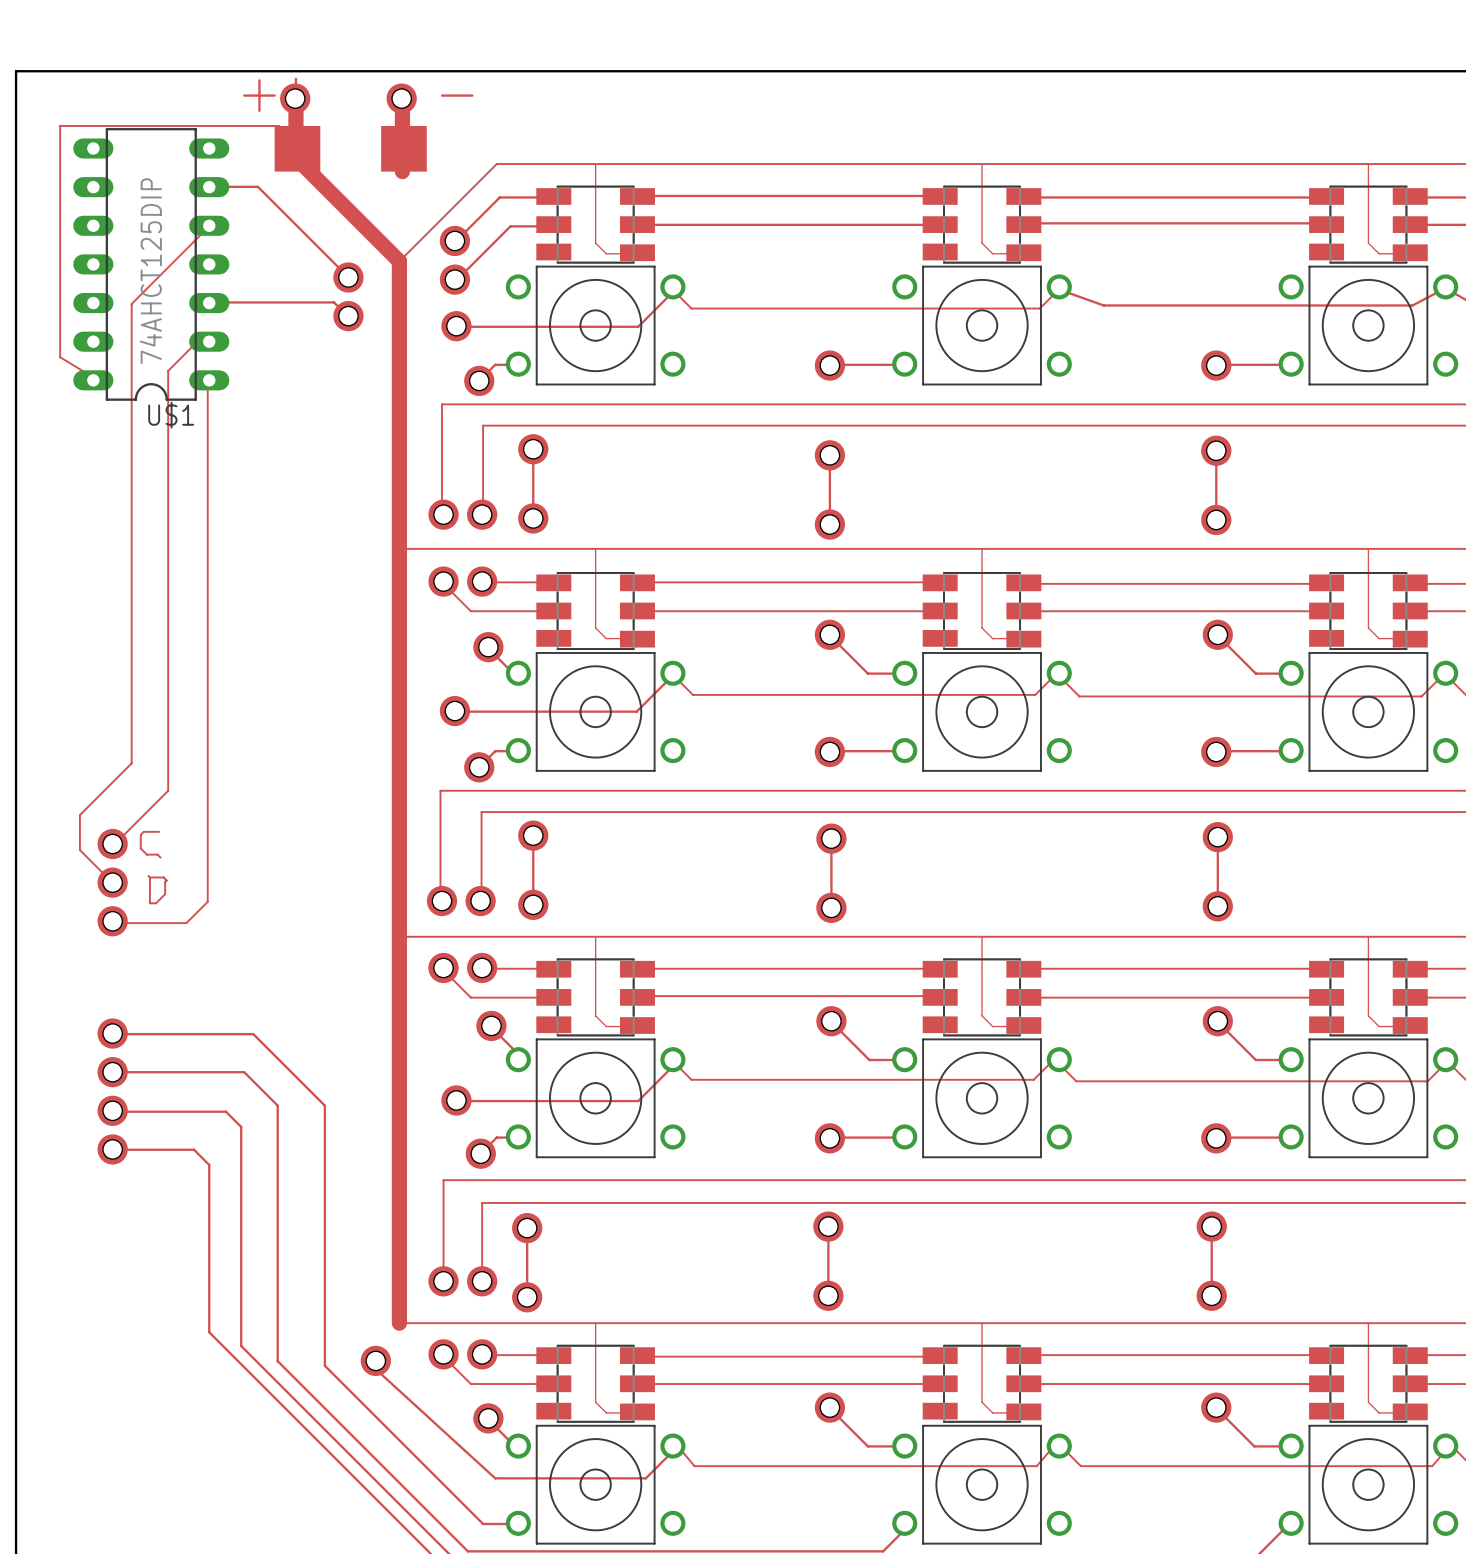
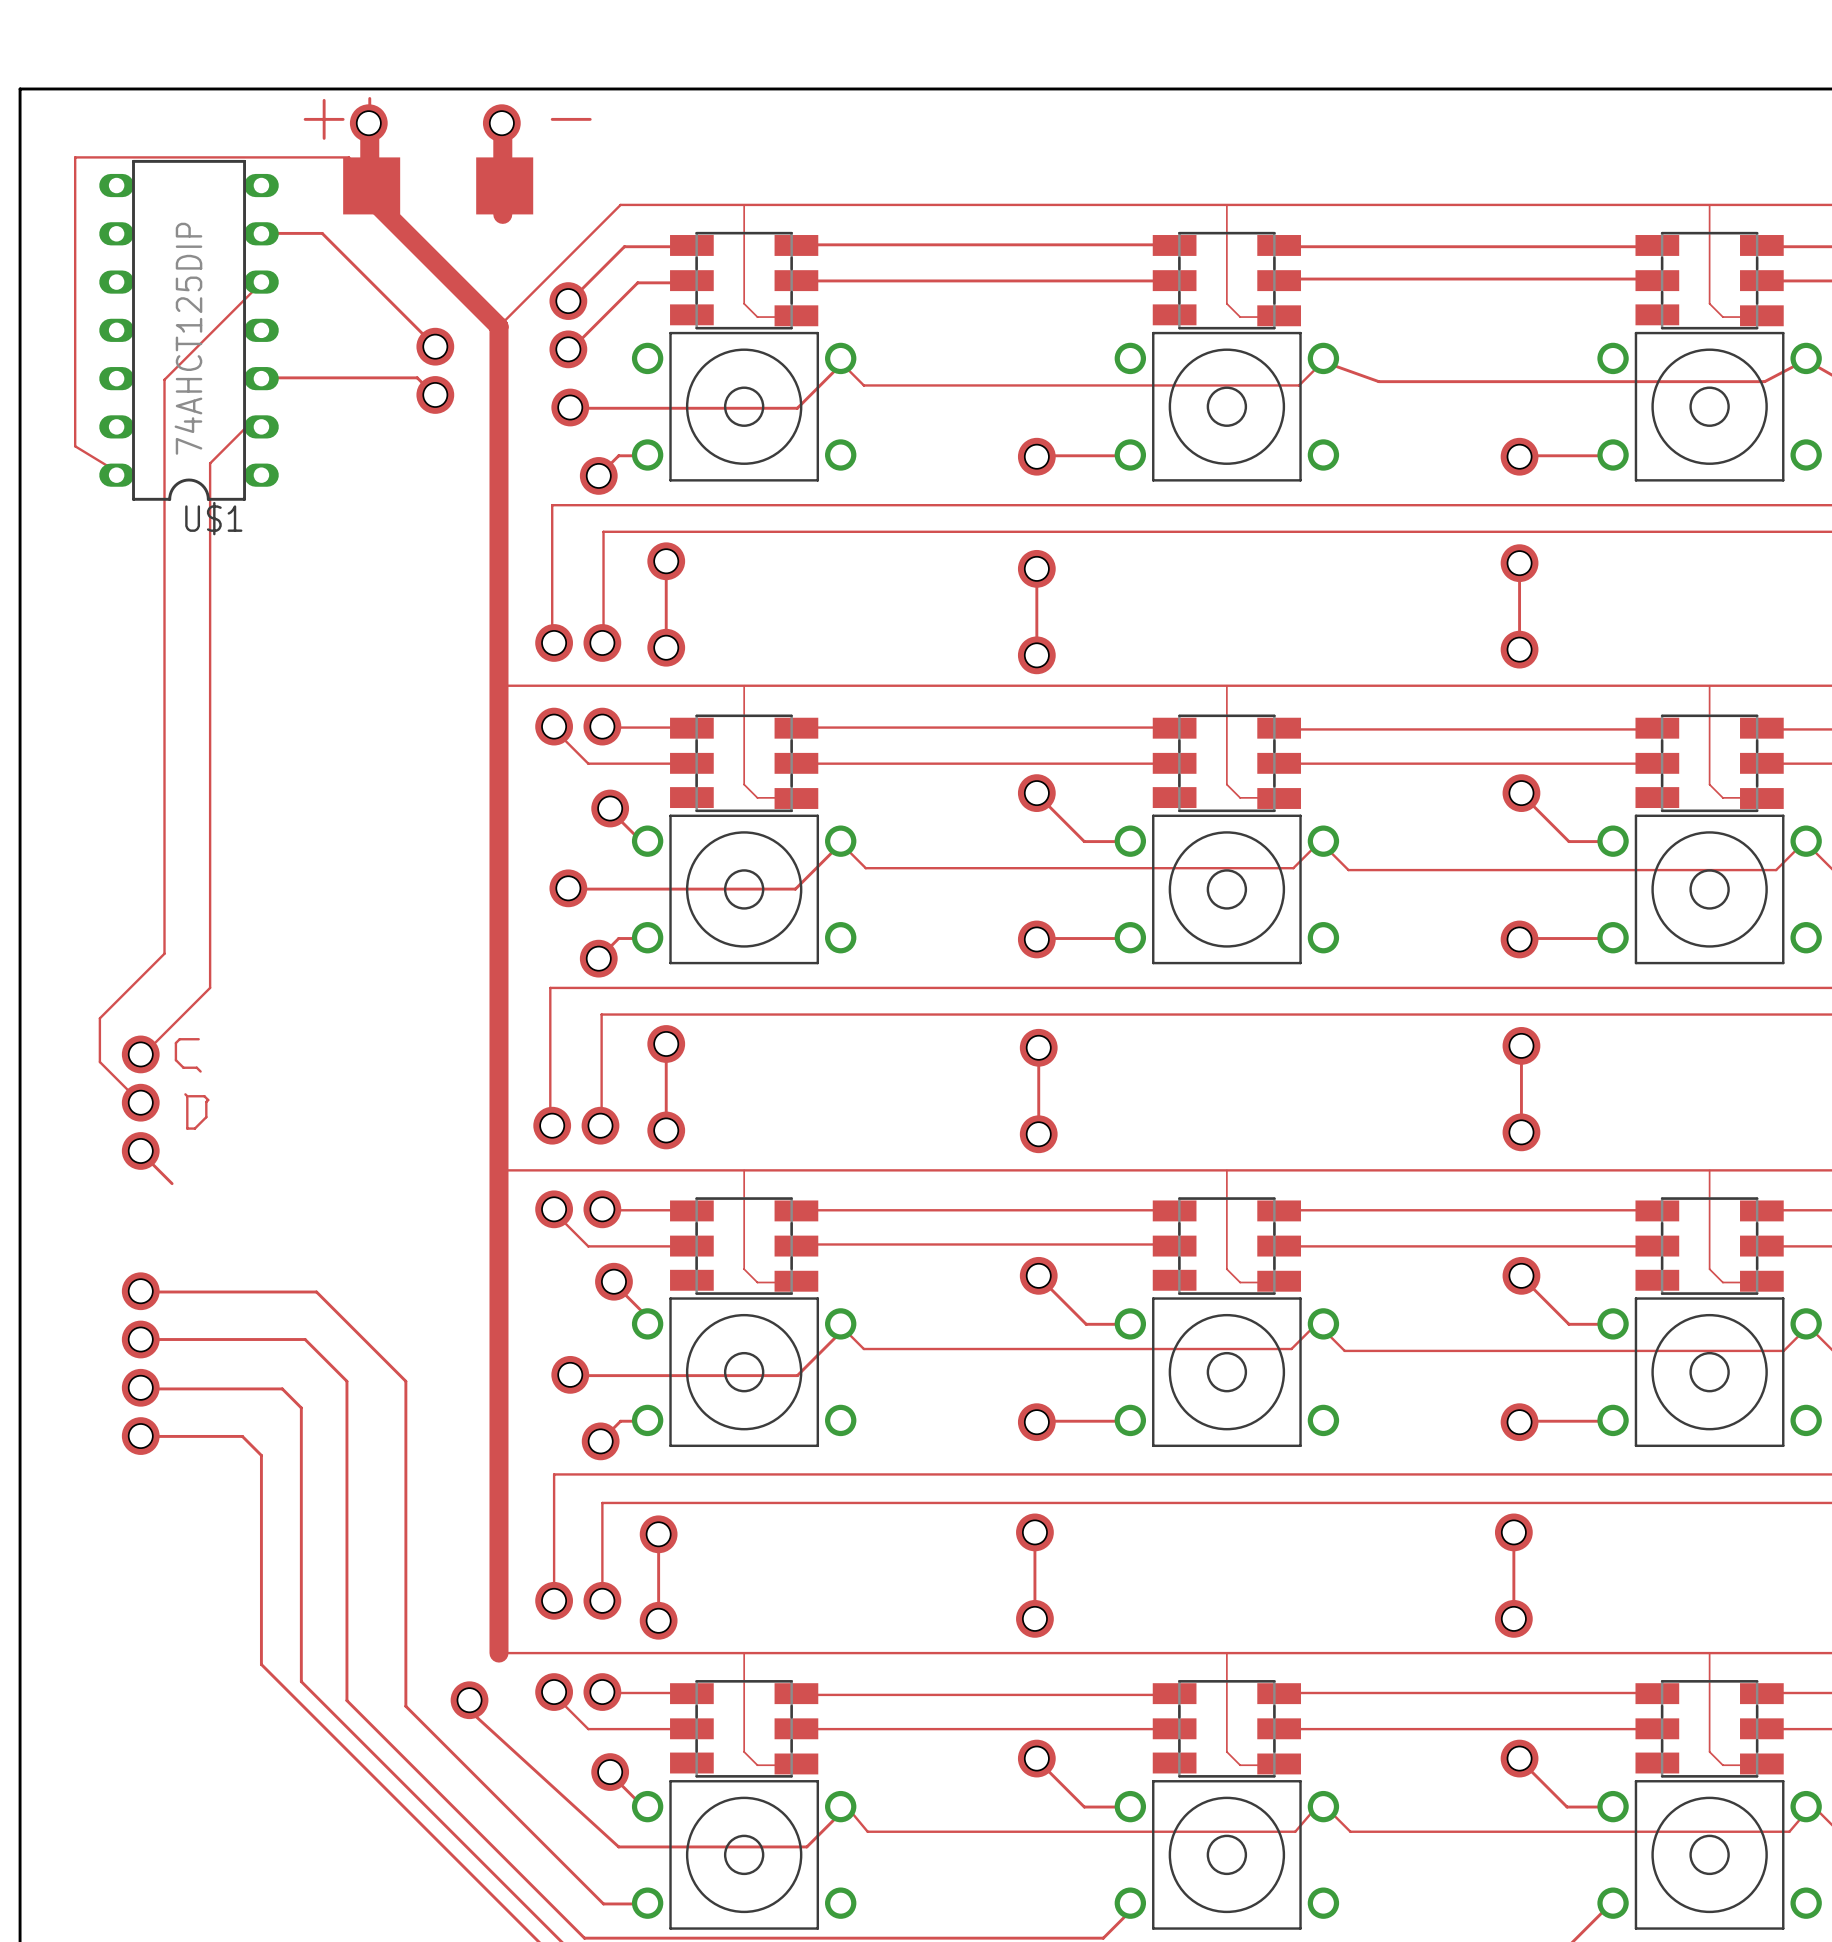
U$1 footprint: [73, 128, 230, 401] -> [99, 159, 279, 501]
top track: (207, 383) (207, 901) (186, 923) (111, 923) -> none
top track: none -> (151, 1162) (172, 1183)

